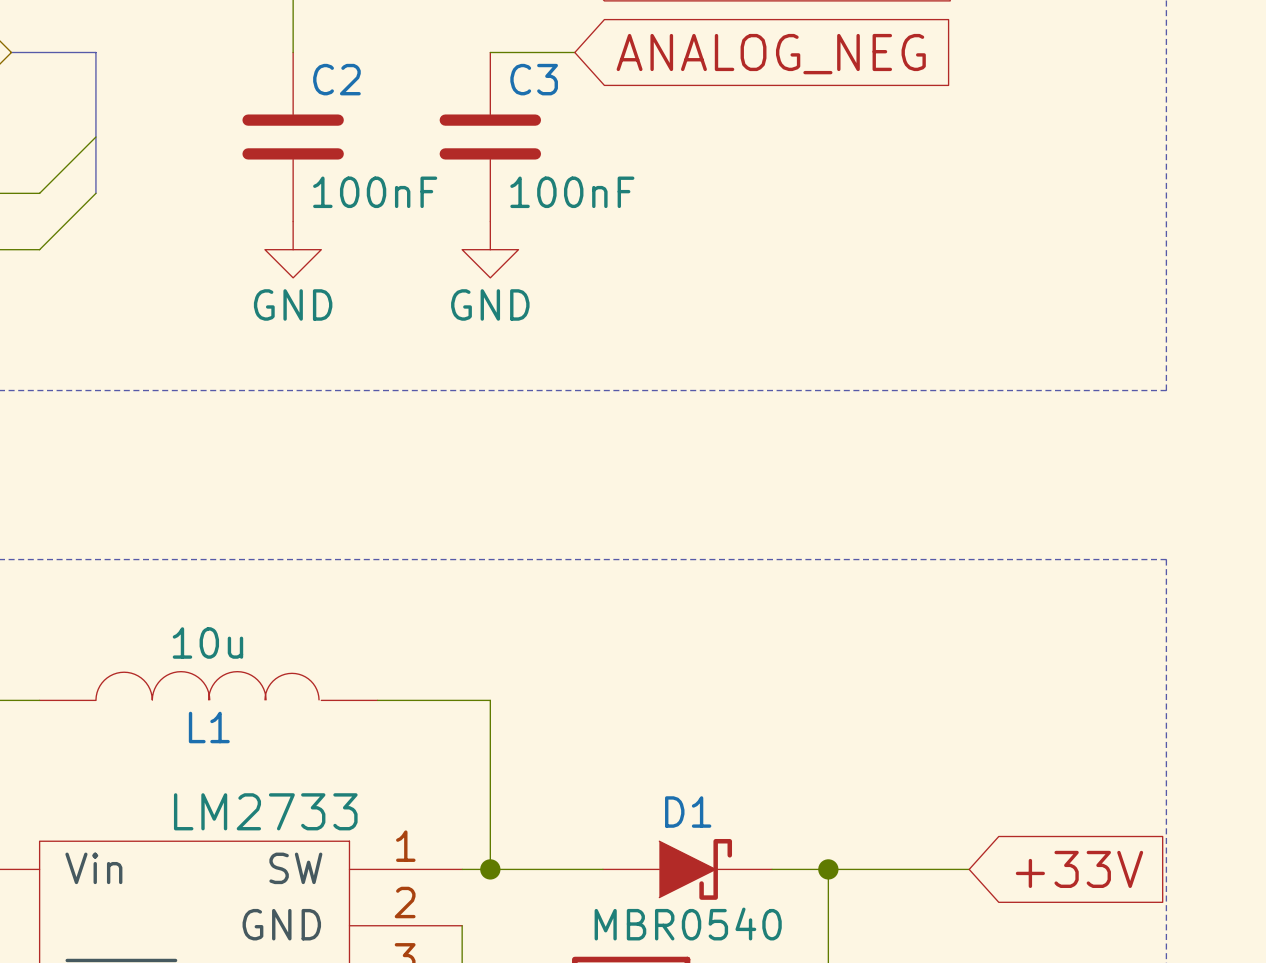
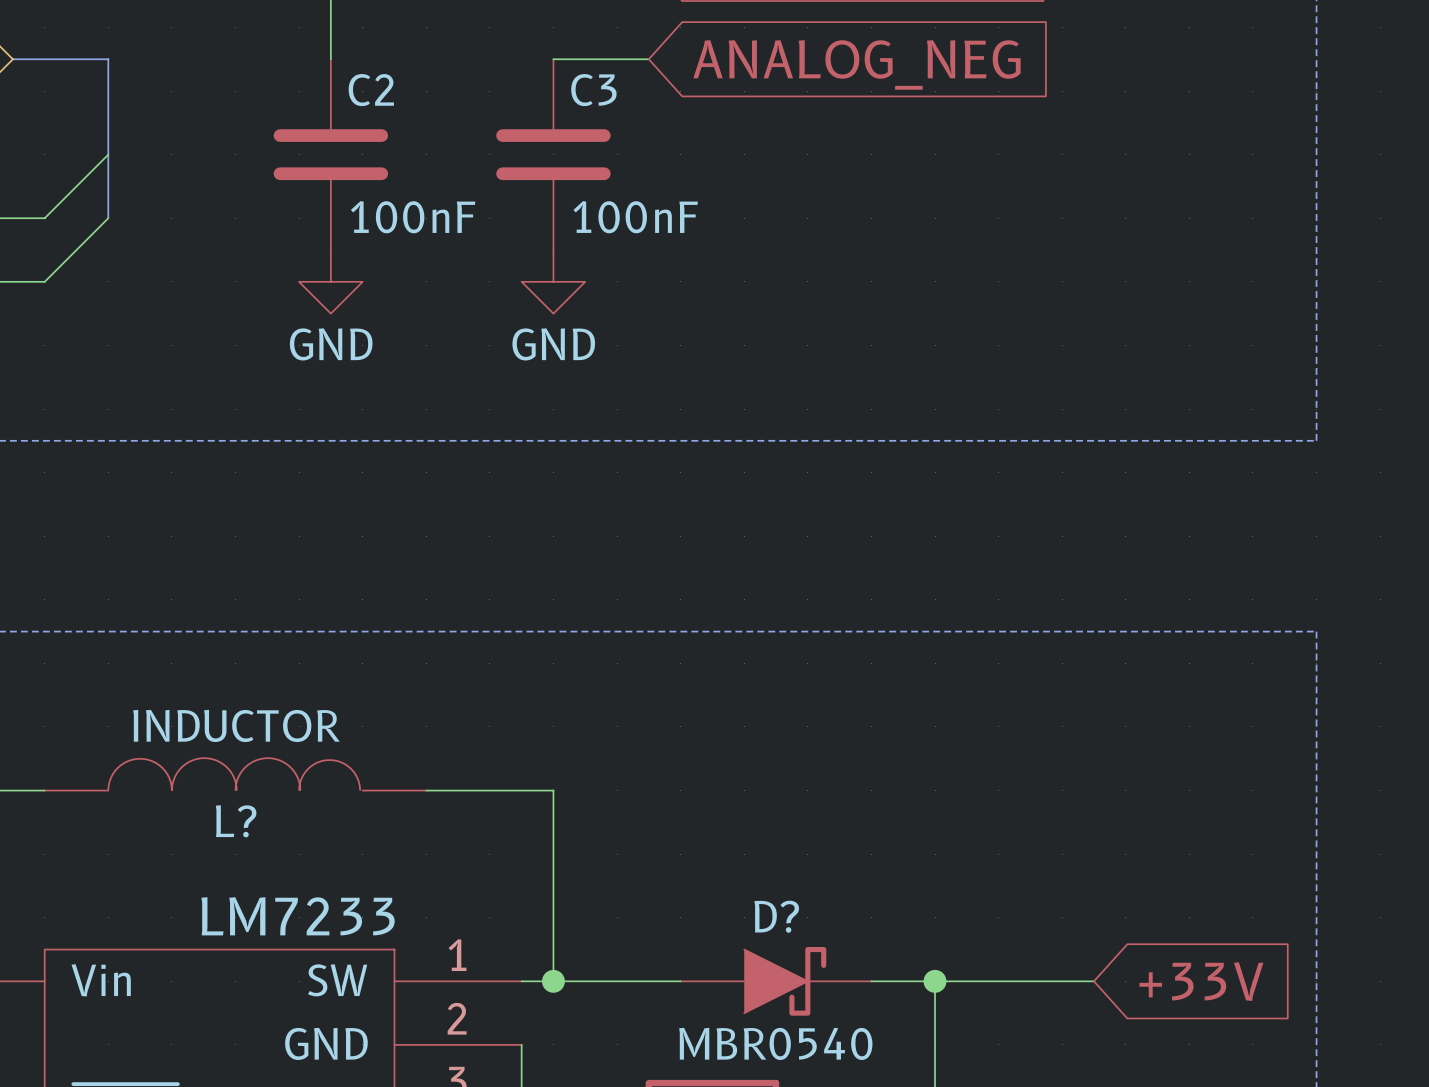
L1 value: 10u (207, 643) -> INDUCTOR (236, 725)
L1 name: L1 (209, 727) -> L? (236, 821)
part value: LM2733 (265, 811) -> LM7233 (298, 916)
D1 name: D1 (688, 812) -> D? (776, 916)

